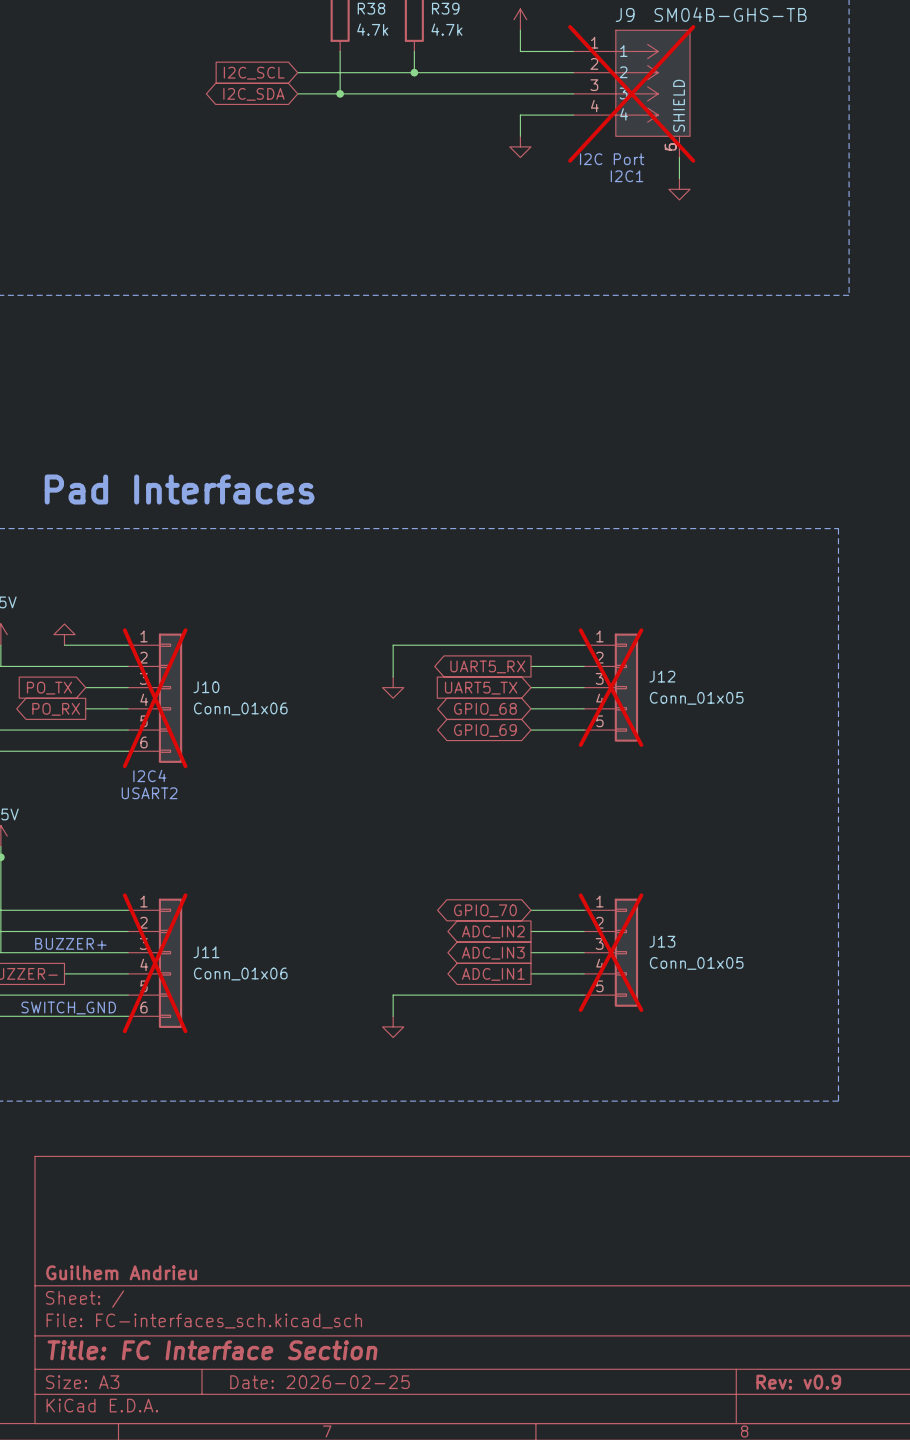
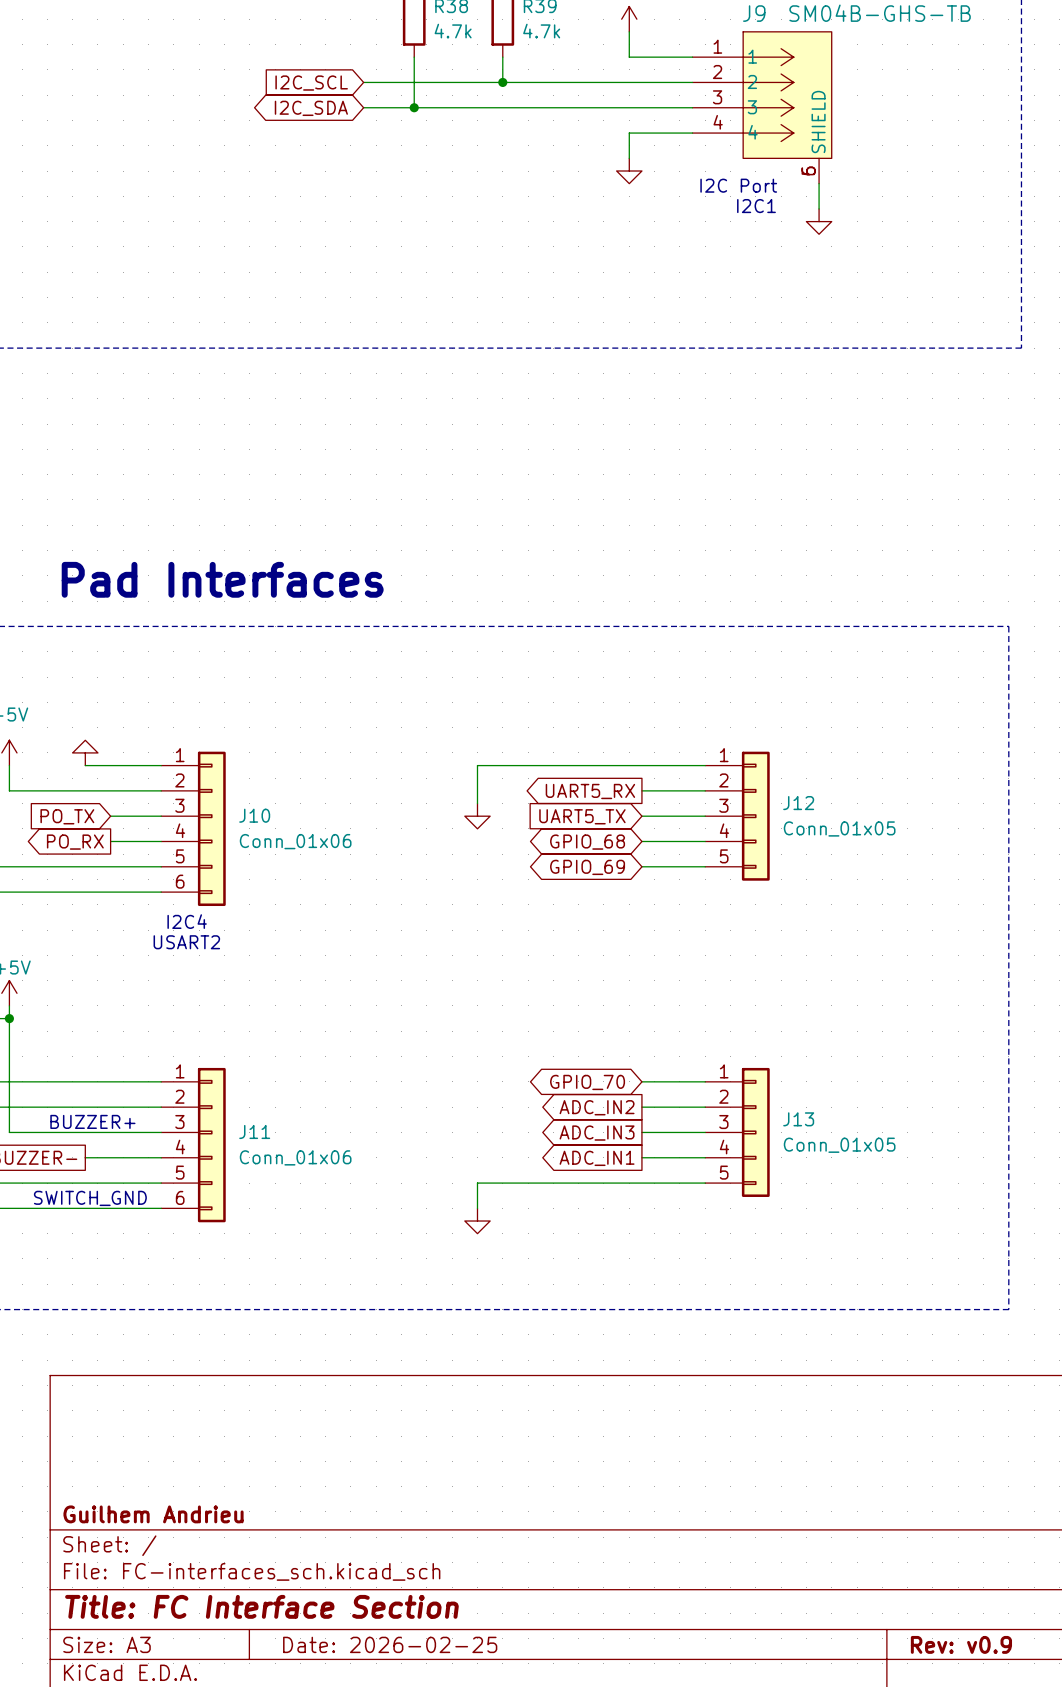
J9 do-not-place cross: (631, 93) -> none
J12 do-not-place cross: (611, 687) -> none
J10 do-not-place cross: (155, 698) -> none
J13 do-not-place cross: (611, 952) -> none
J11 do-not-place cross: (155, 963) -> none

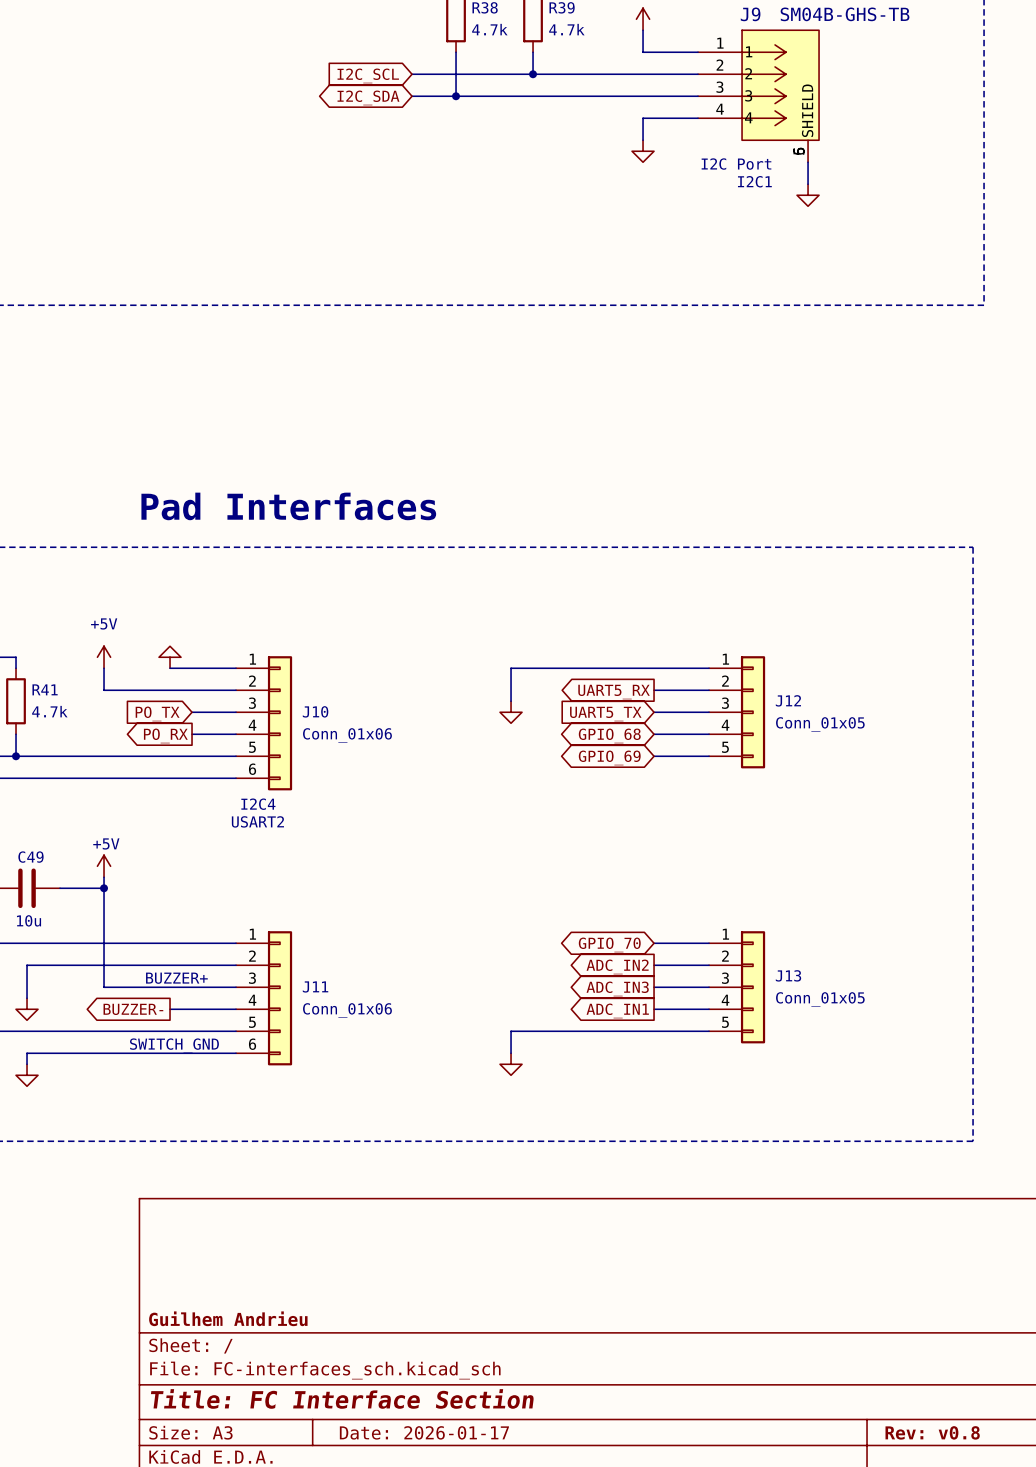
title block: Date: 2026-02-25 (390, 1644) -> Date: 2026-01-17 (424, 1432)
title block: Rev: v0.9 (961, 1644) -> Rev: v0.8 (932, 1432)

